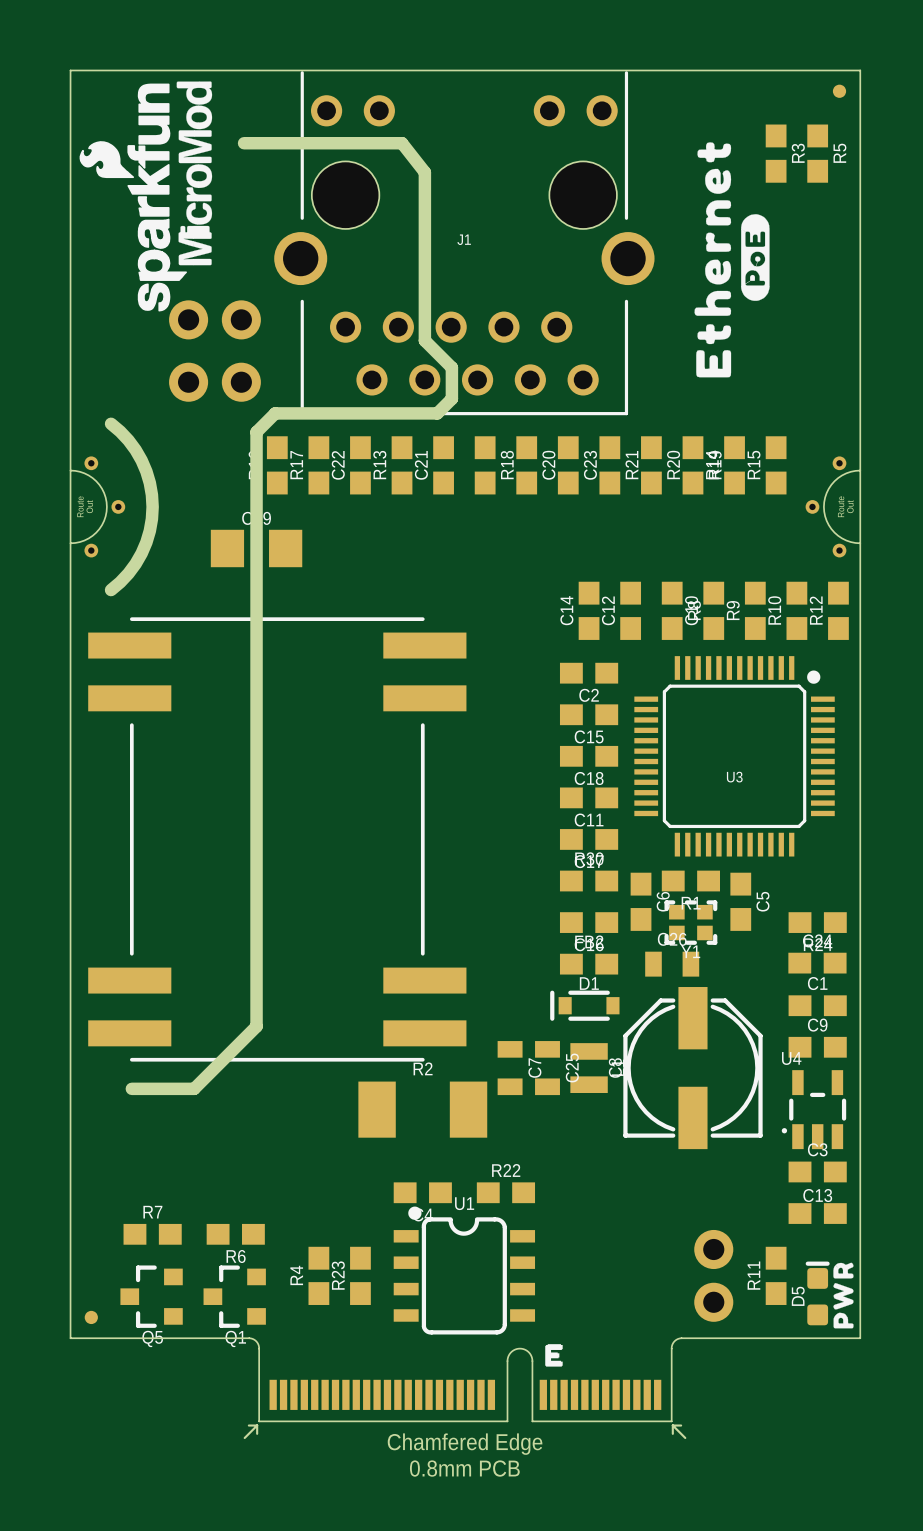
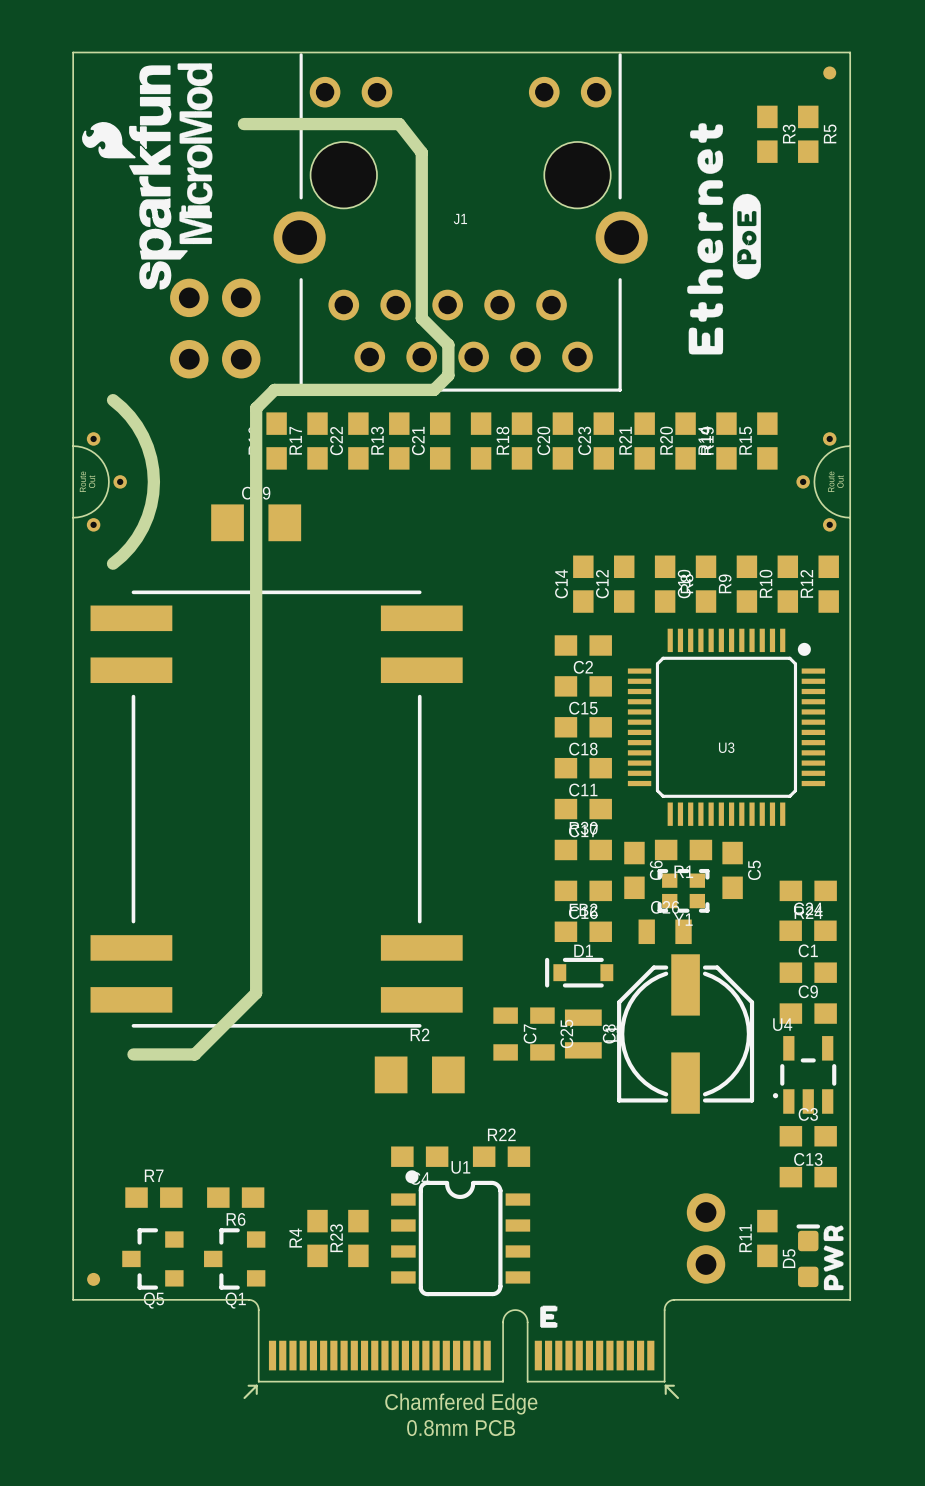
R2 footprint: [358, 1081, 488, 1138] -> [374, 1056, 465, 1094]

